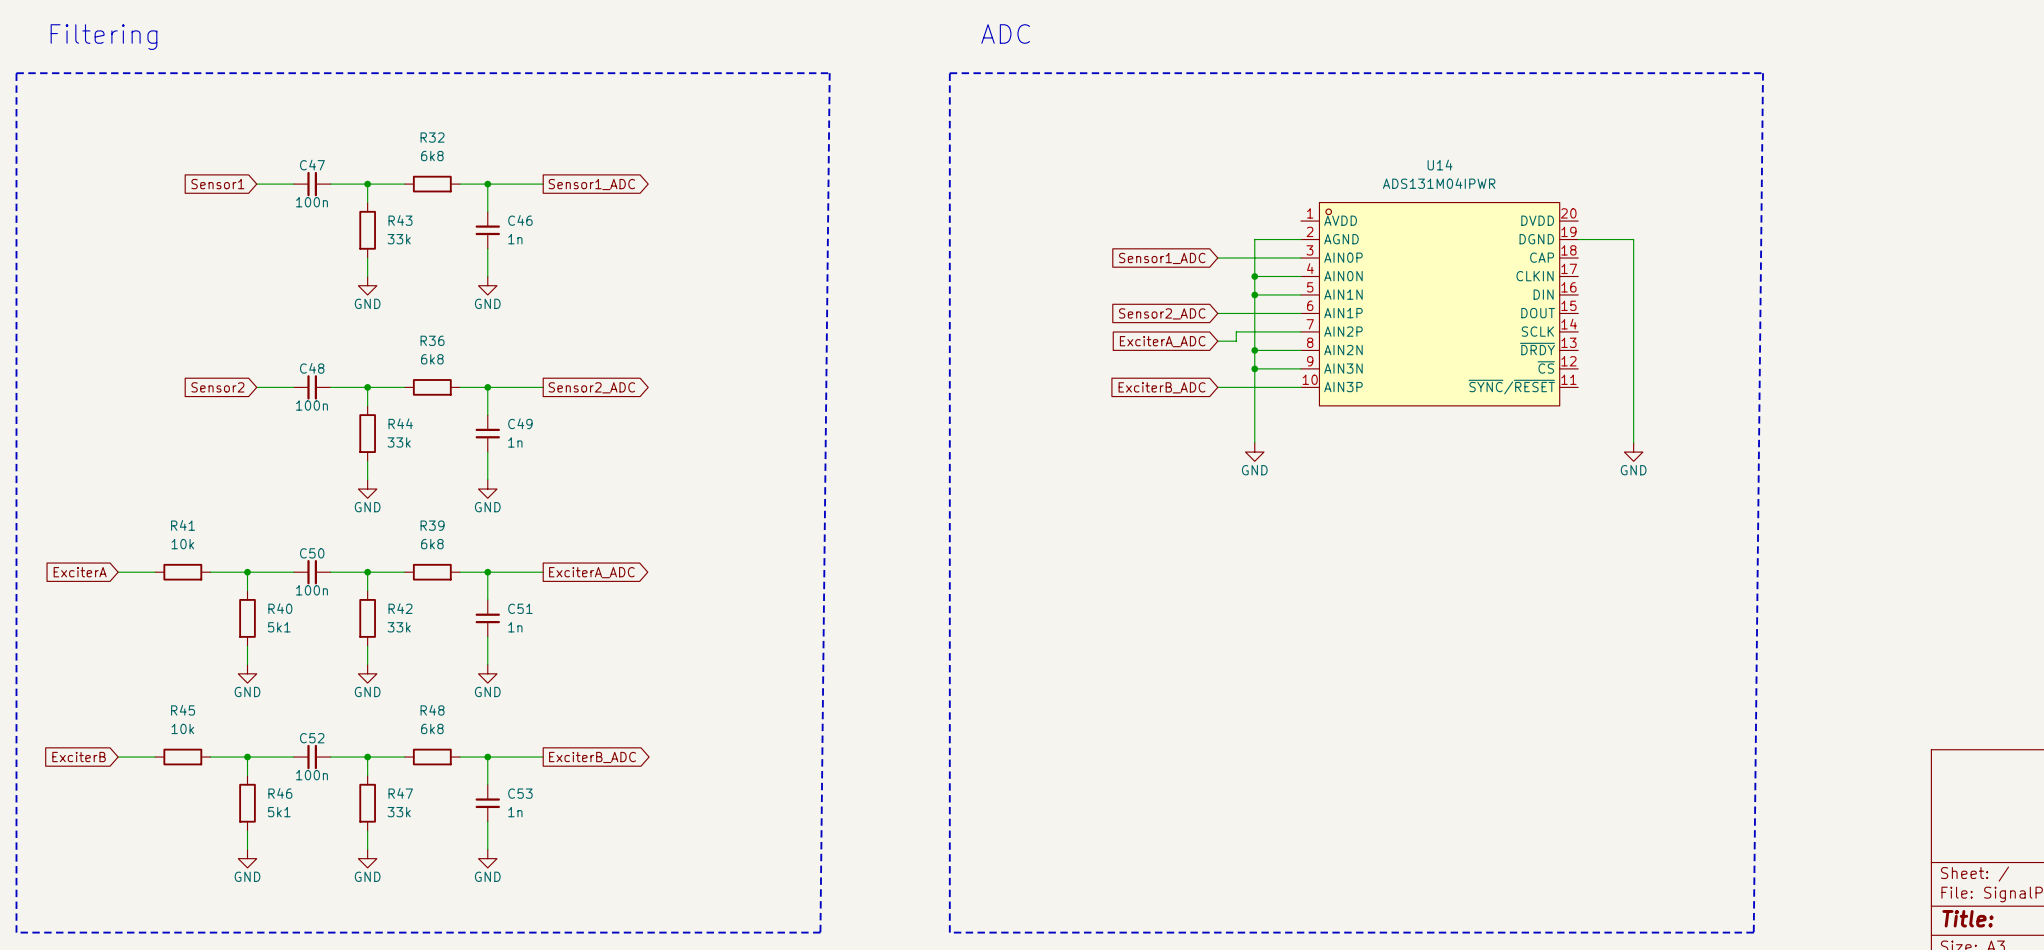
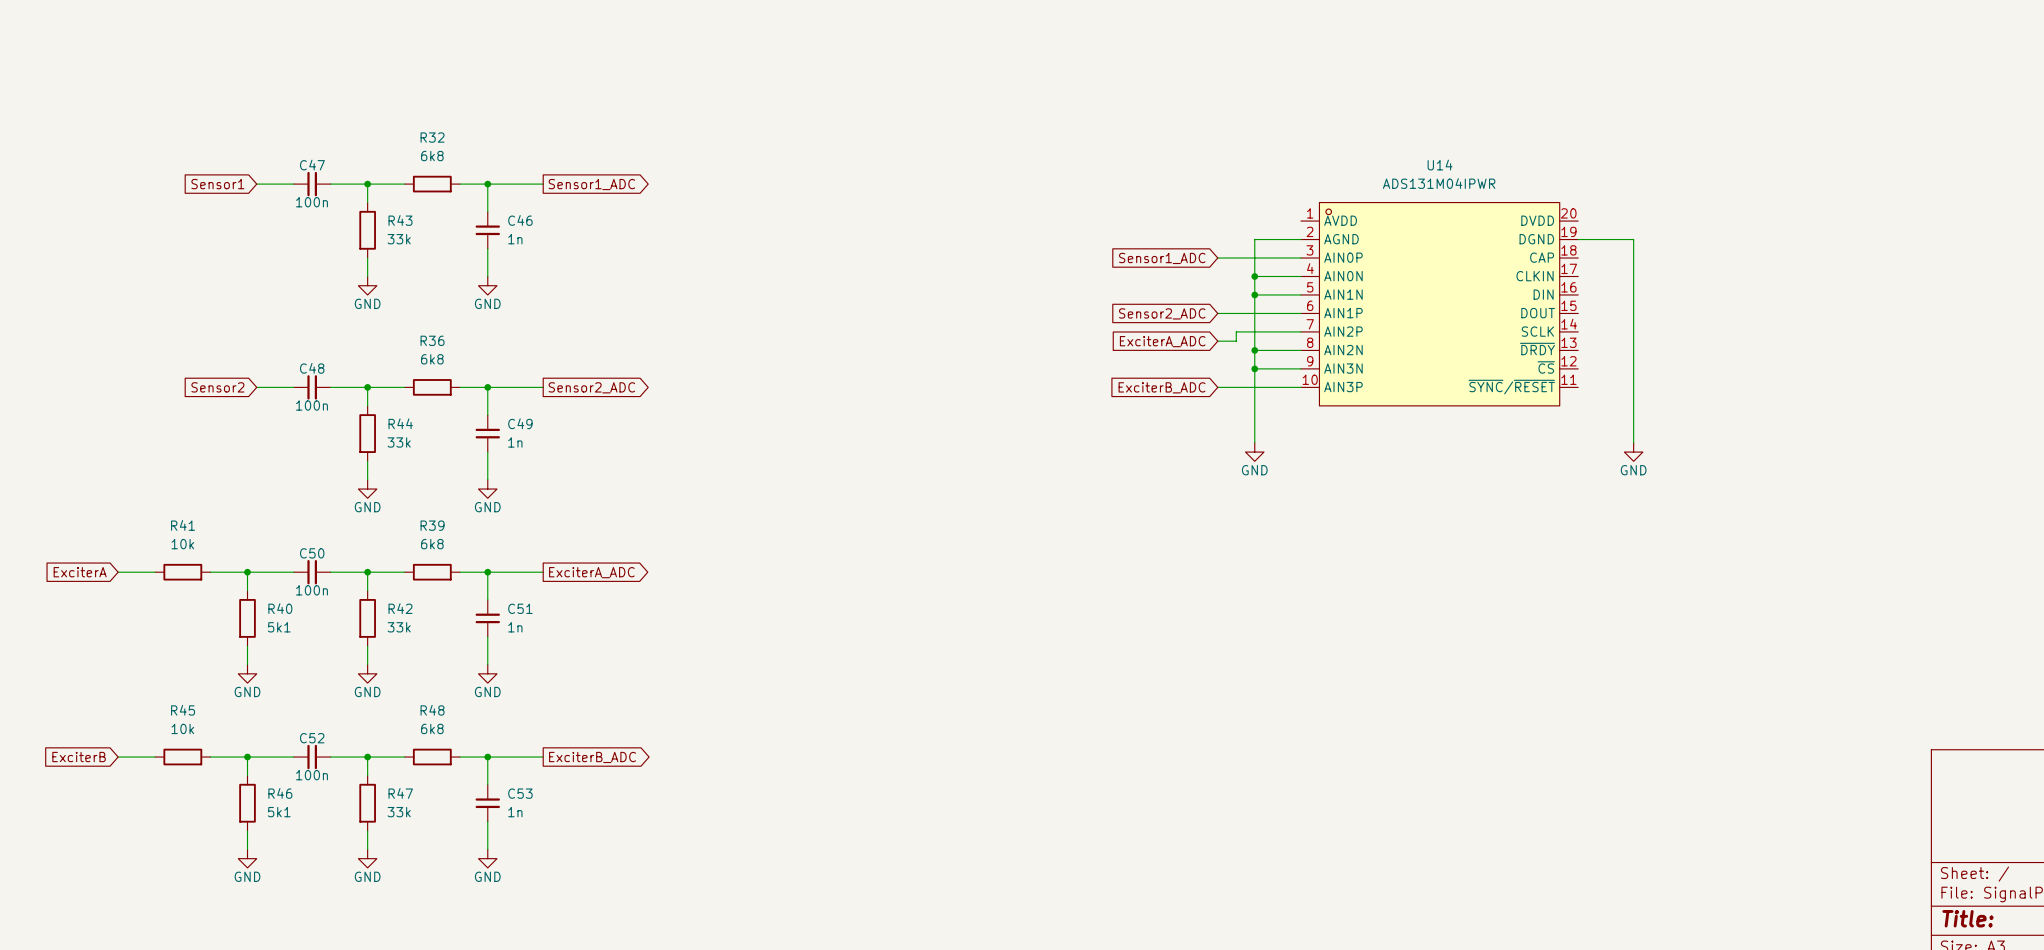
text: ADC (1005, 34) -> none
text: Filtering (103, 37) -> none
line: (16, 69) (16, 932) (820, 932) (829, 73) (16, 73) -> none
line: (949, 69) (949, 932) (1753, 932) (1763, 73) (949, 73) -> none

